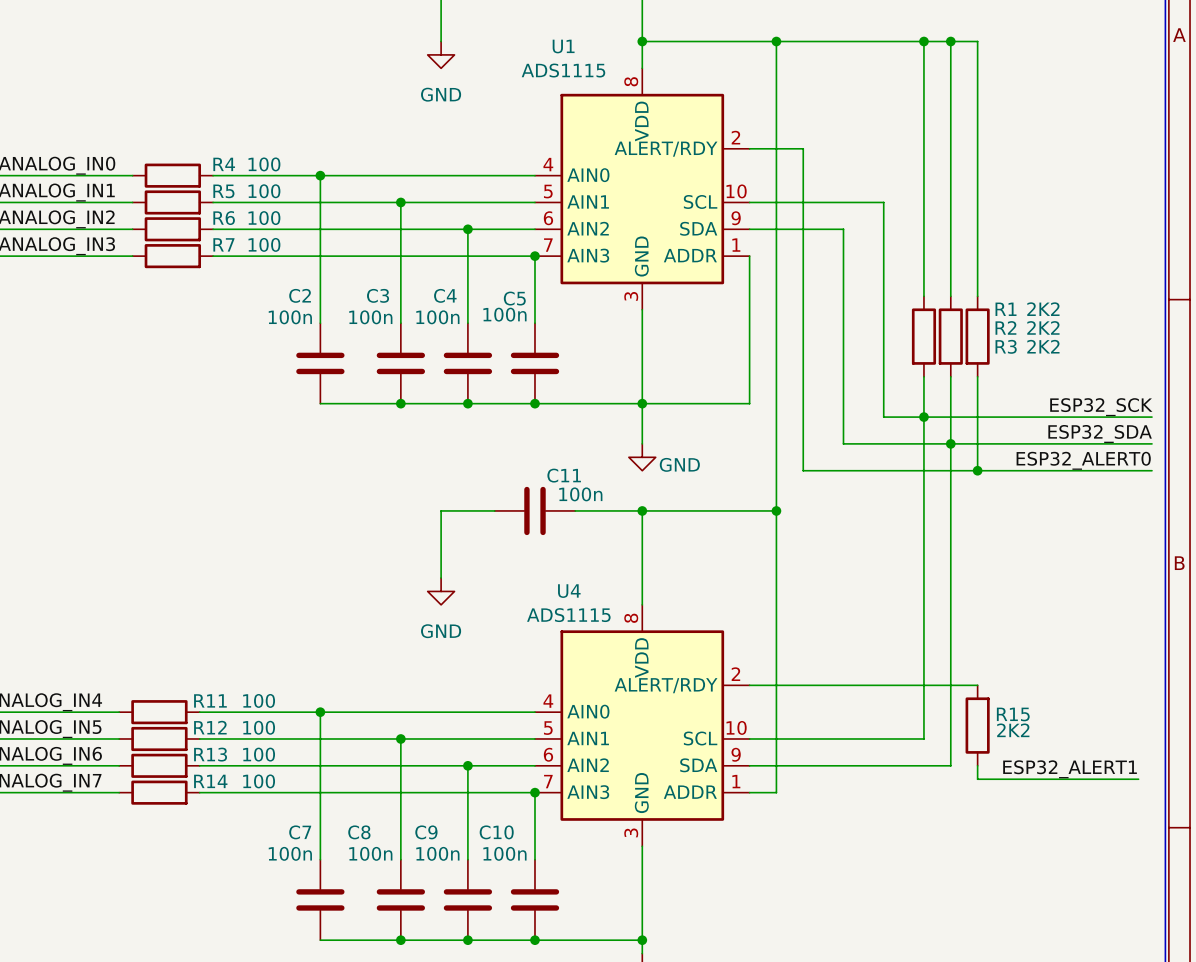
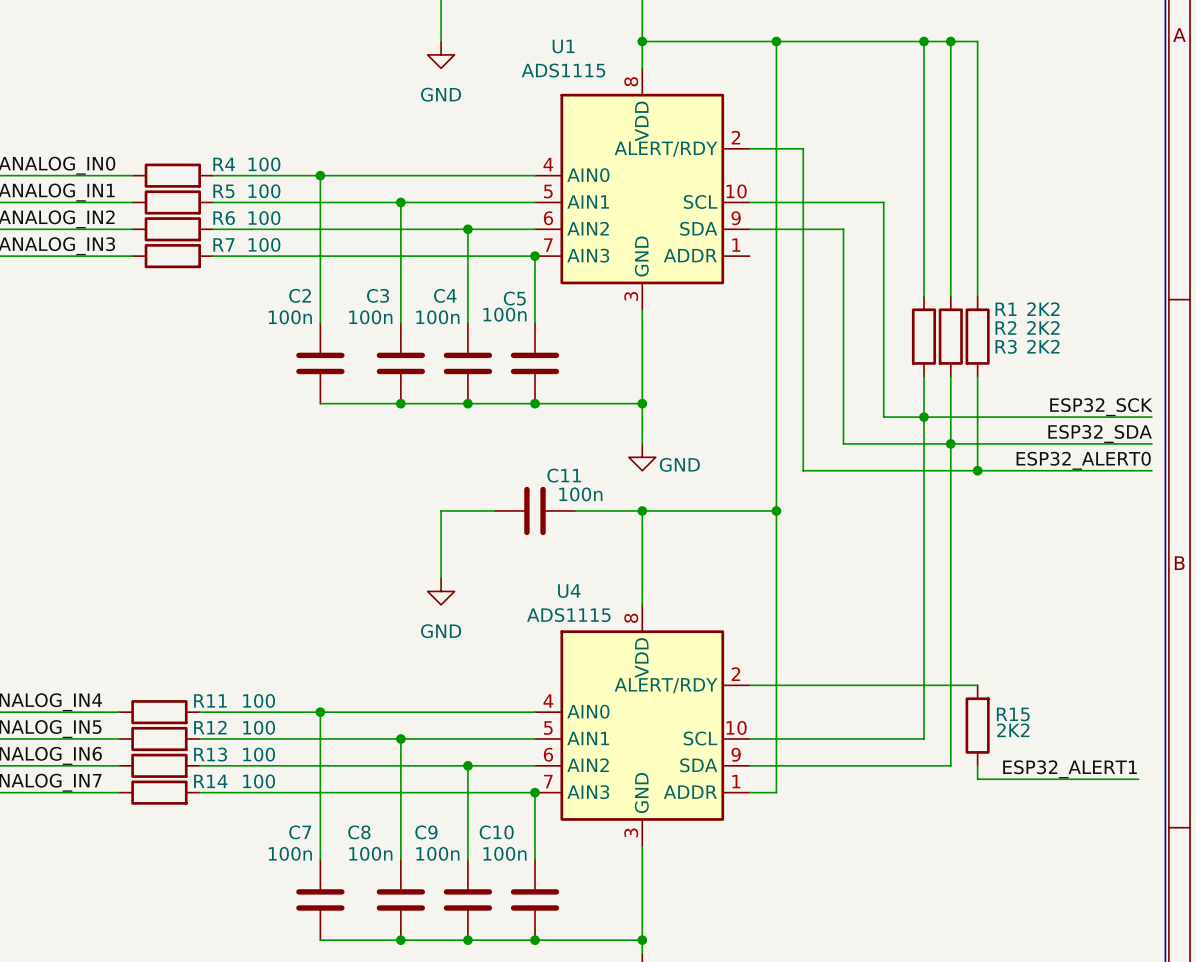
wire: (749, 256) (749, 403) (642, 403) -> none

